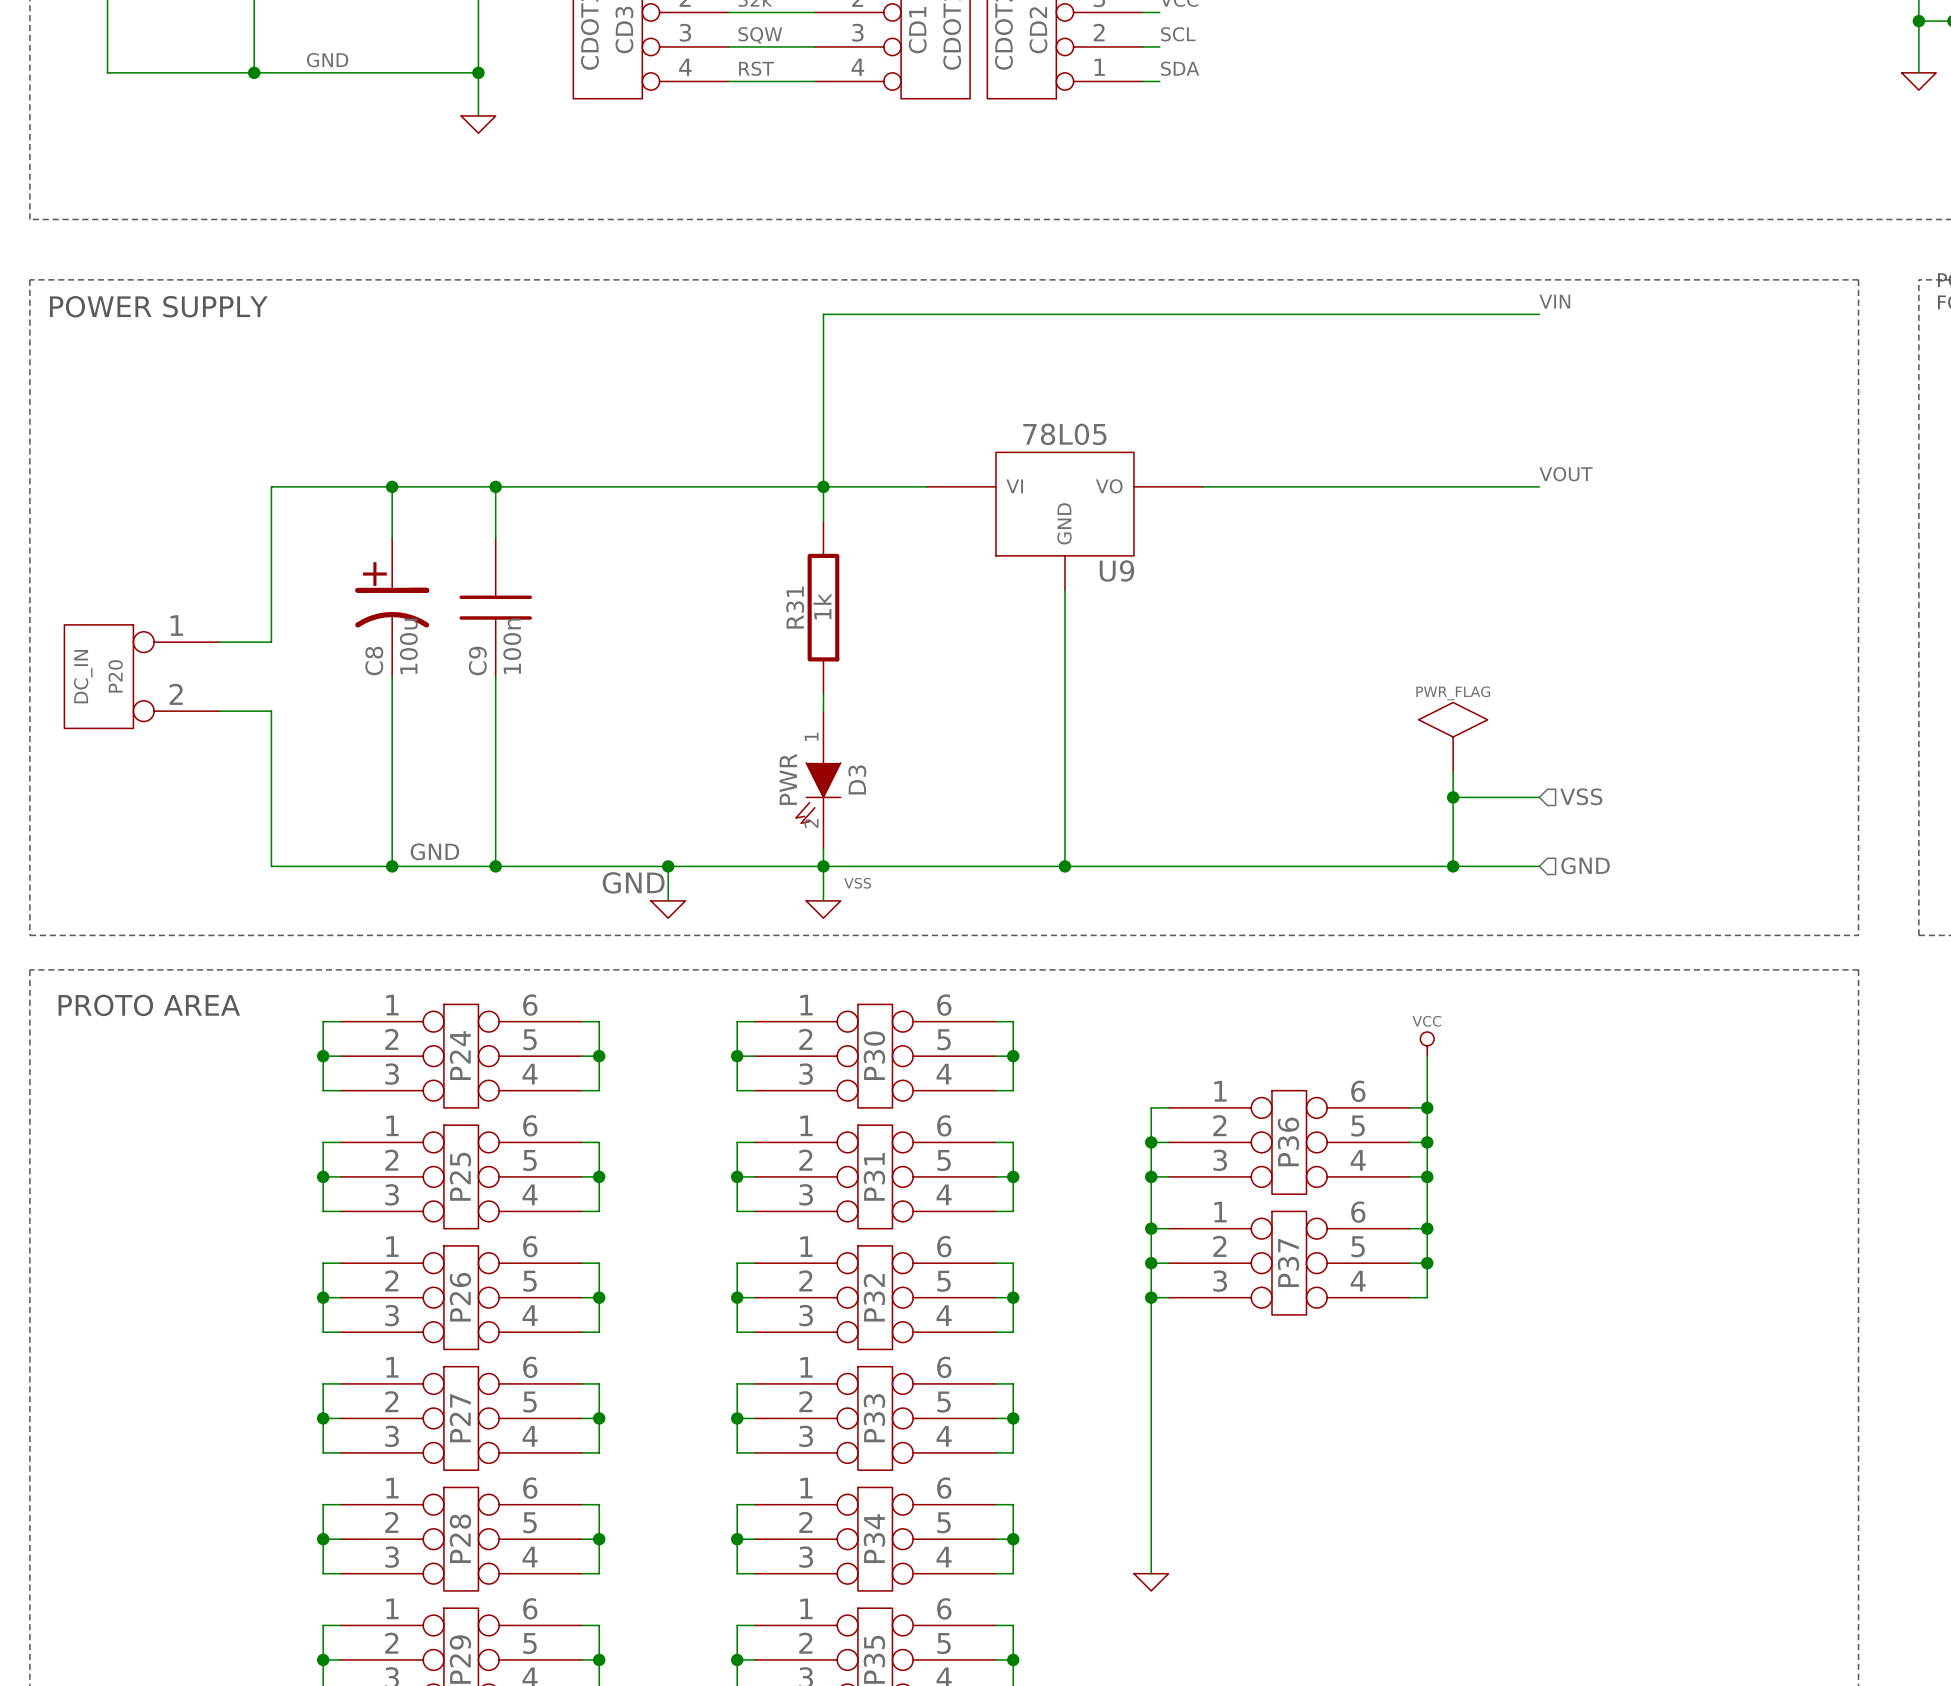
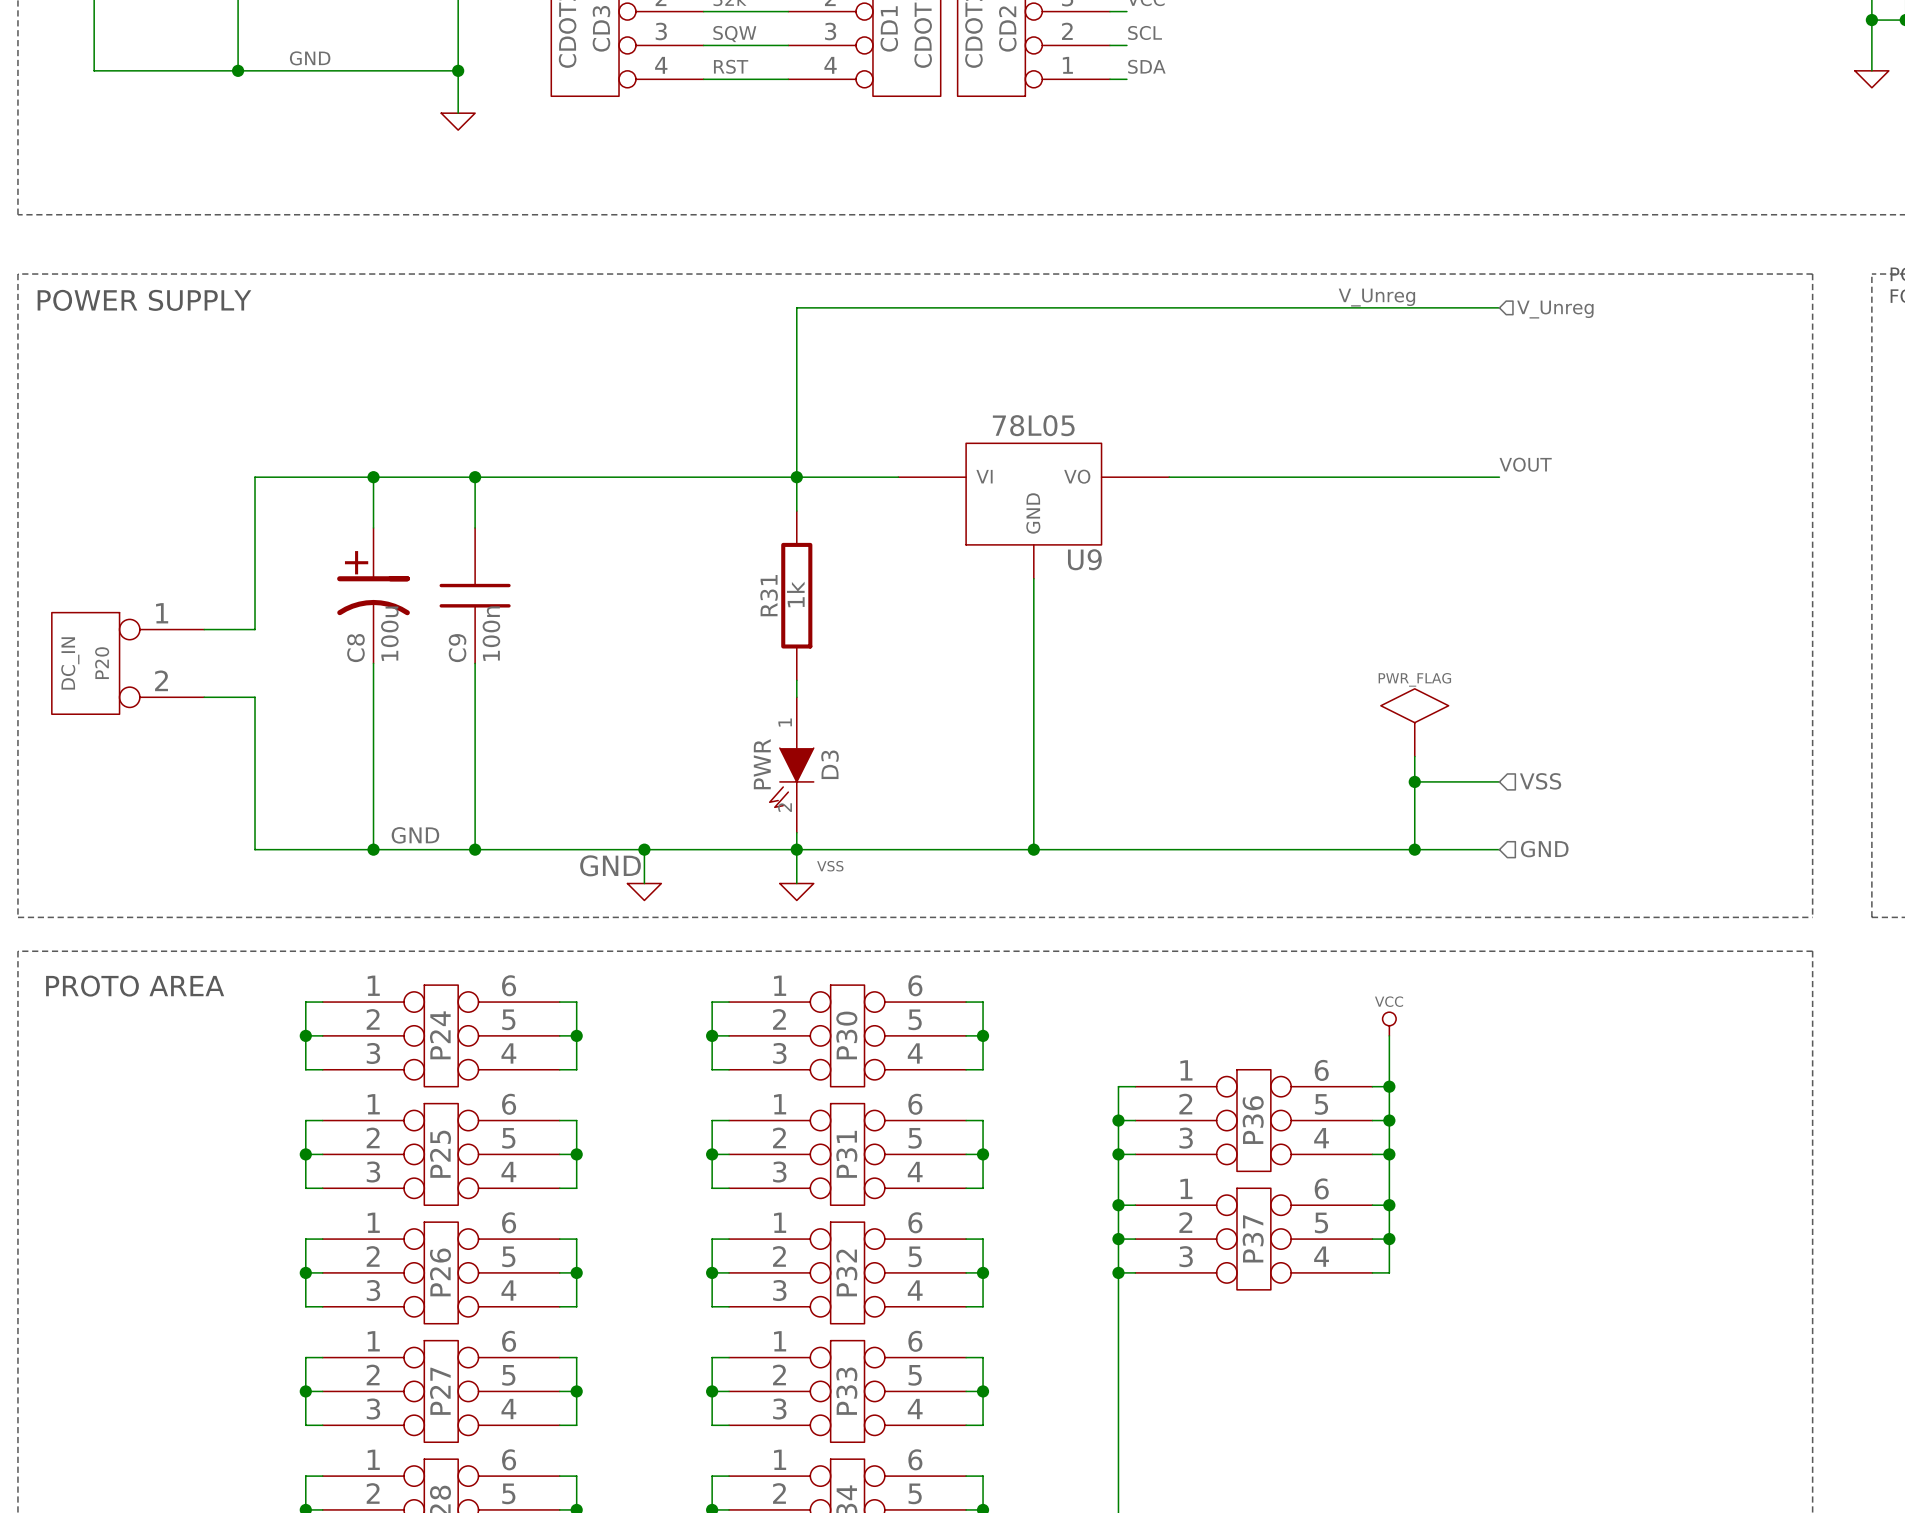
label: VIN (1554, 301) -> none
label: none -> V_Unreg (1376, 297)
hierarchical label: none -> V_Unreg (1555, 309)

